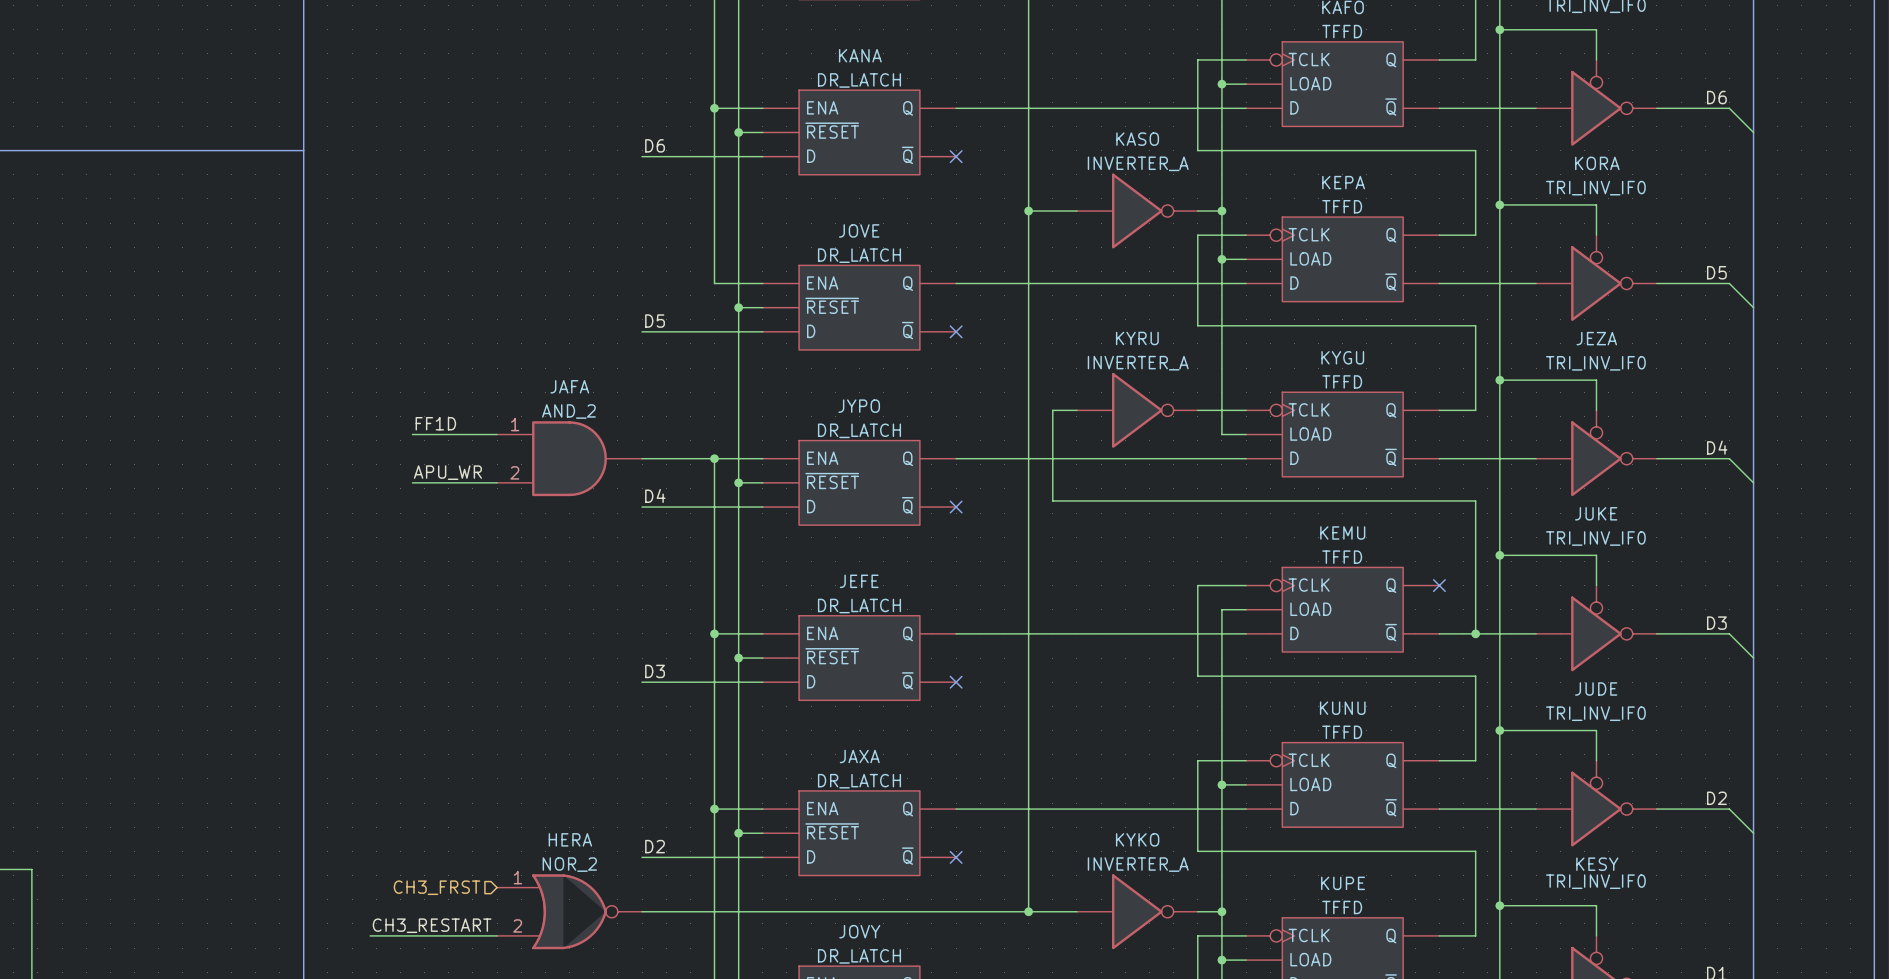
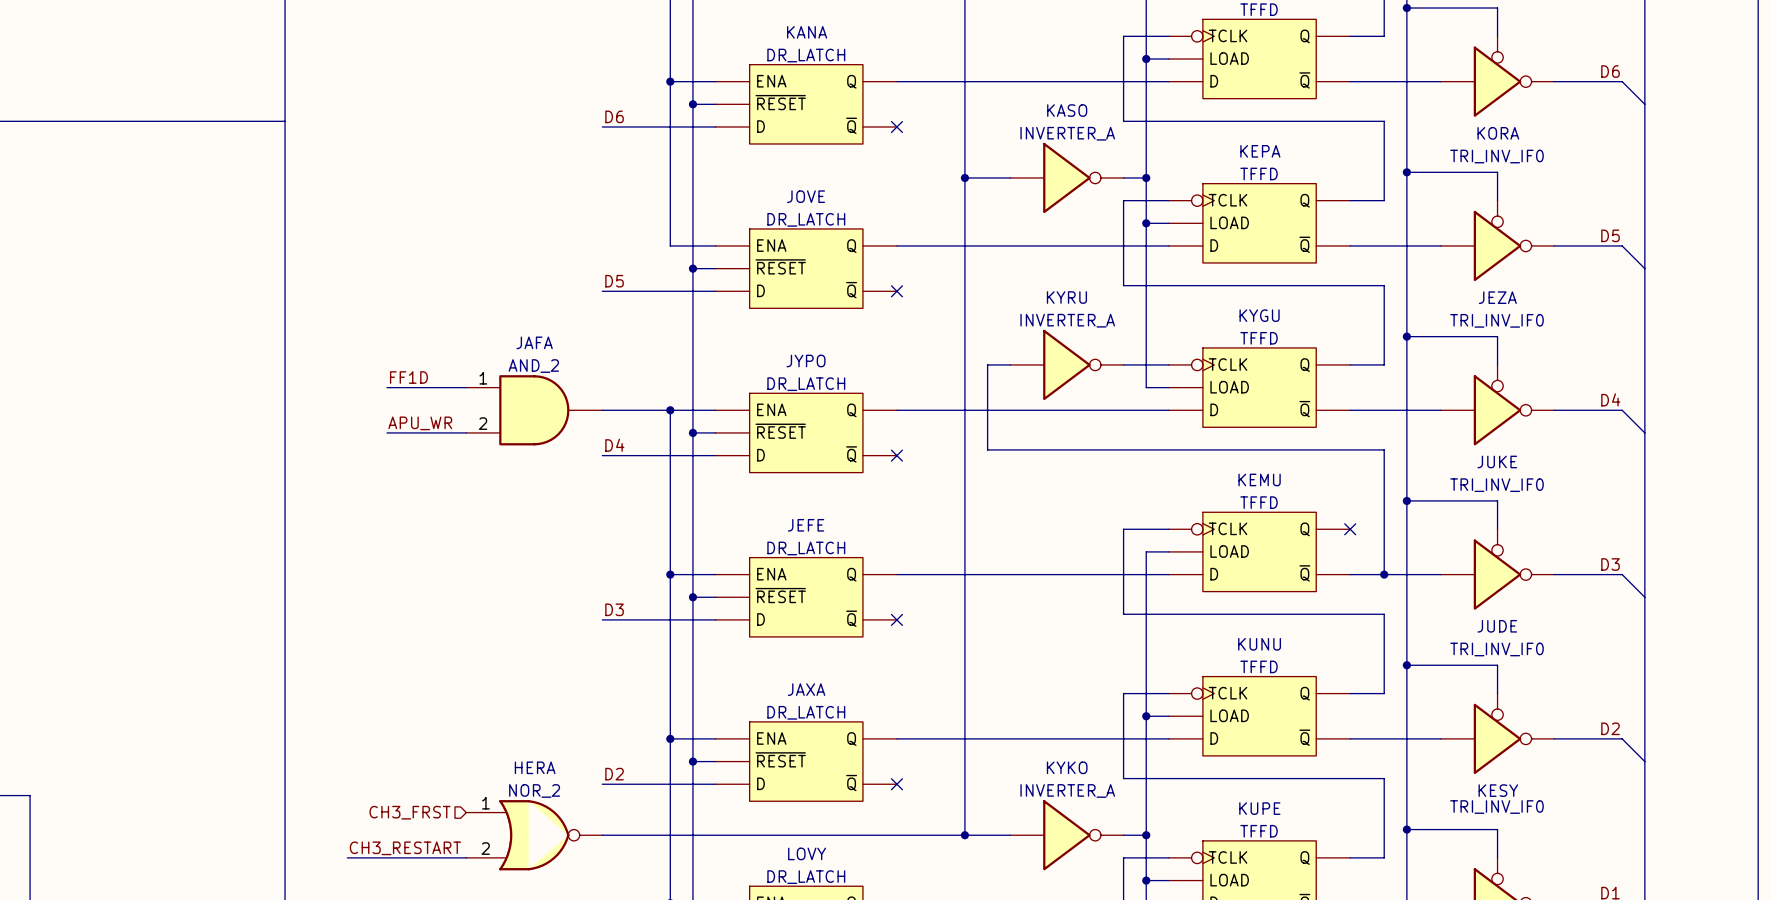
JOVY name: JOVY (859, 931) -> LOVY (807, 853)

